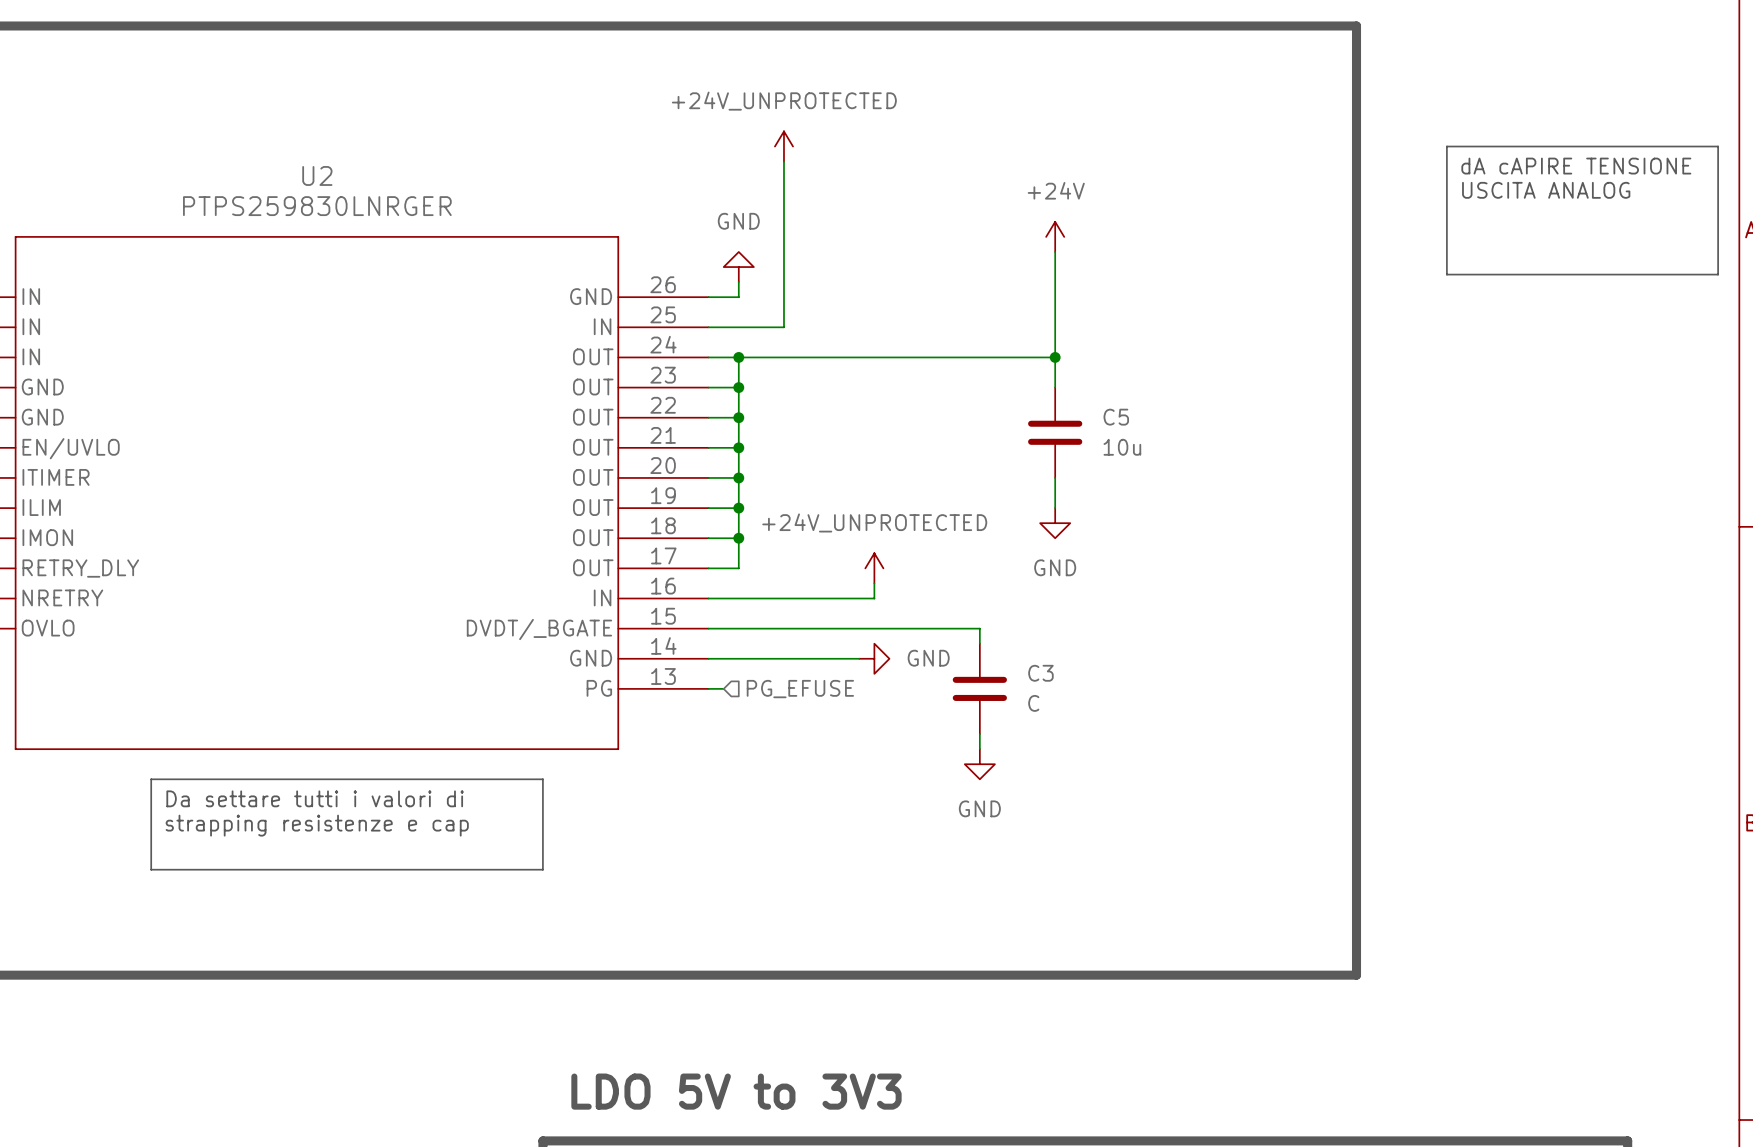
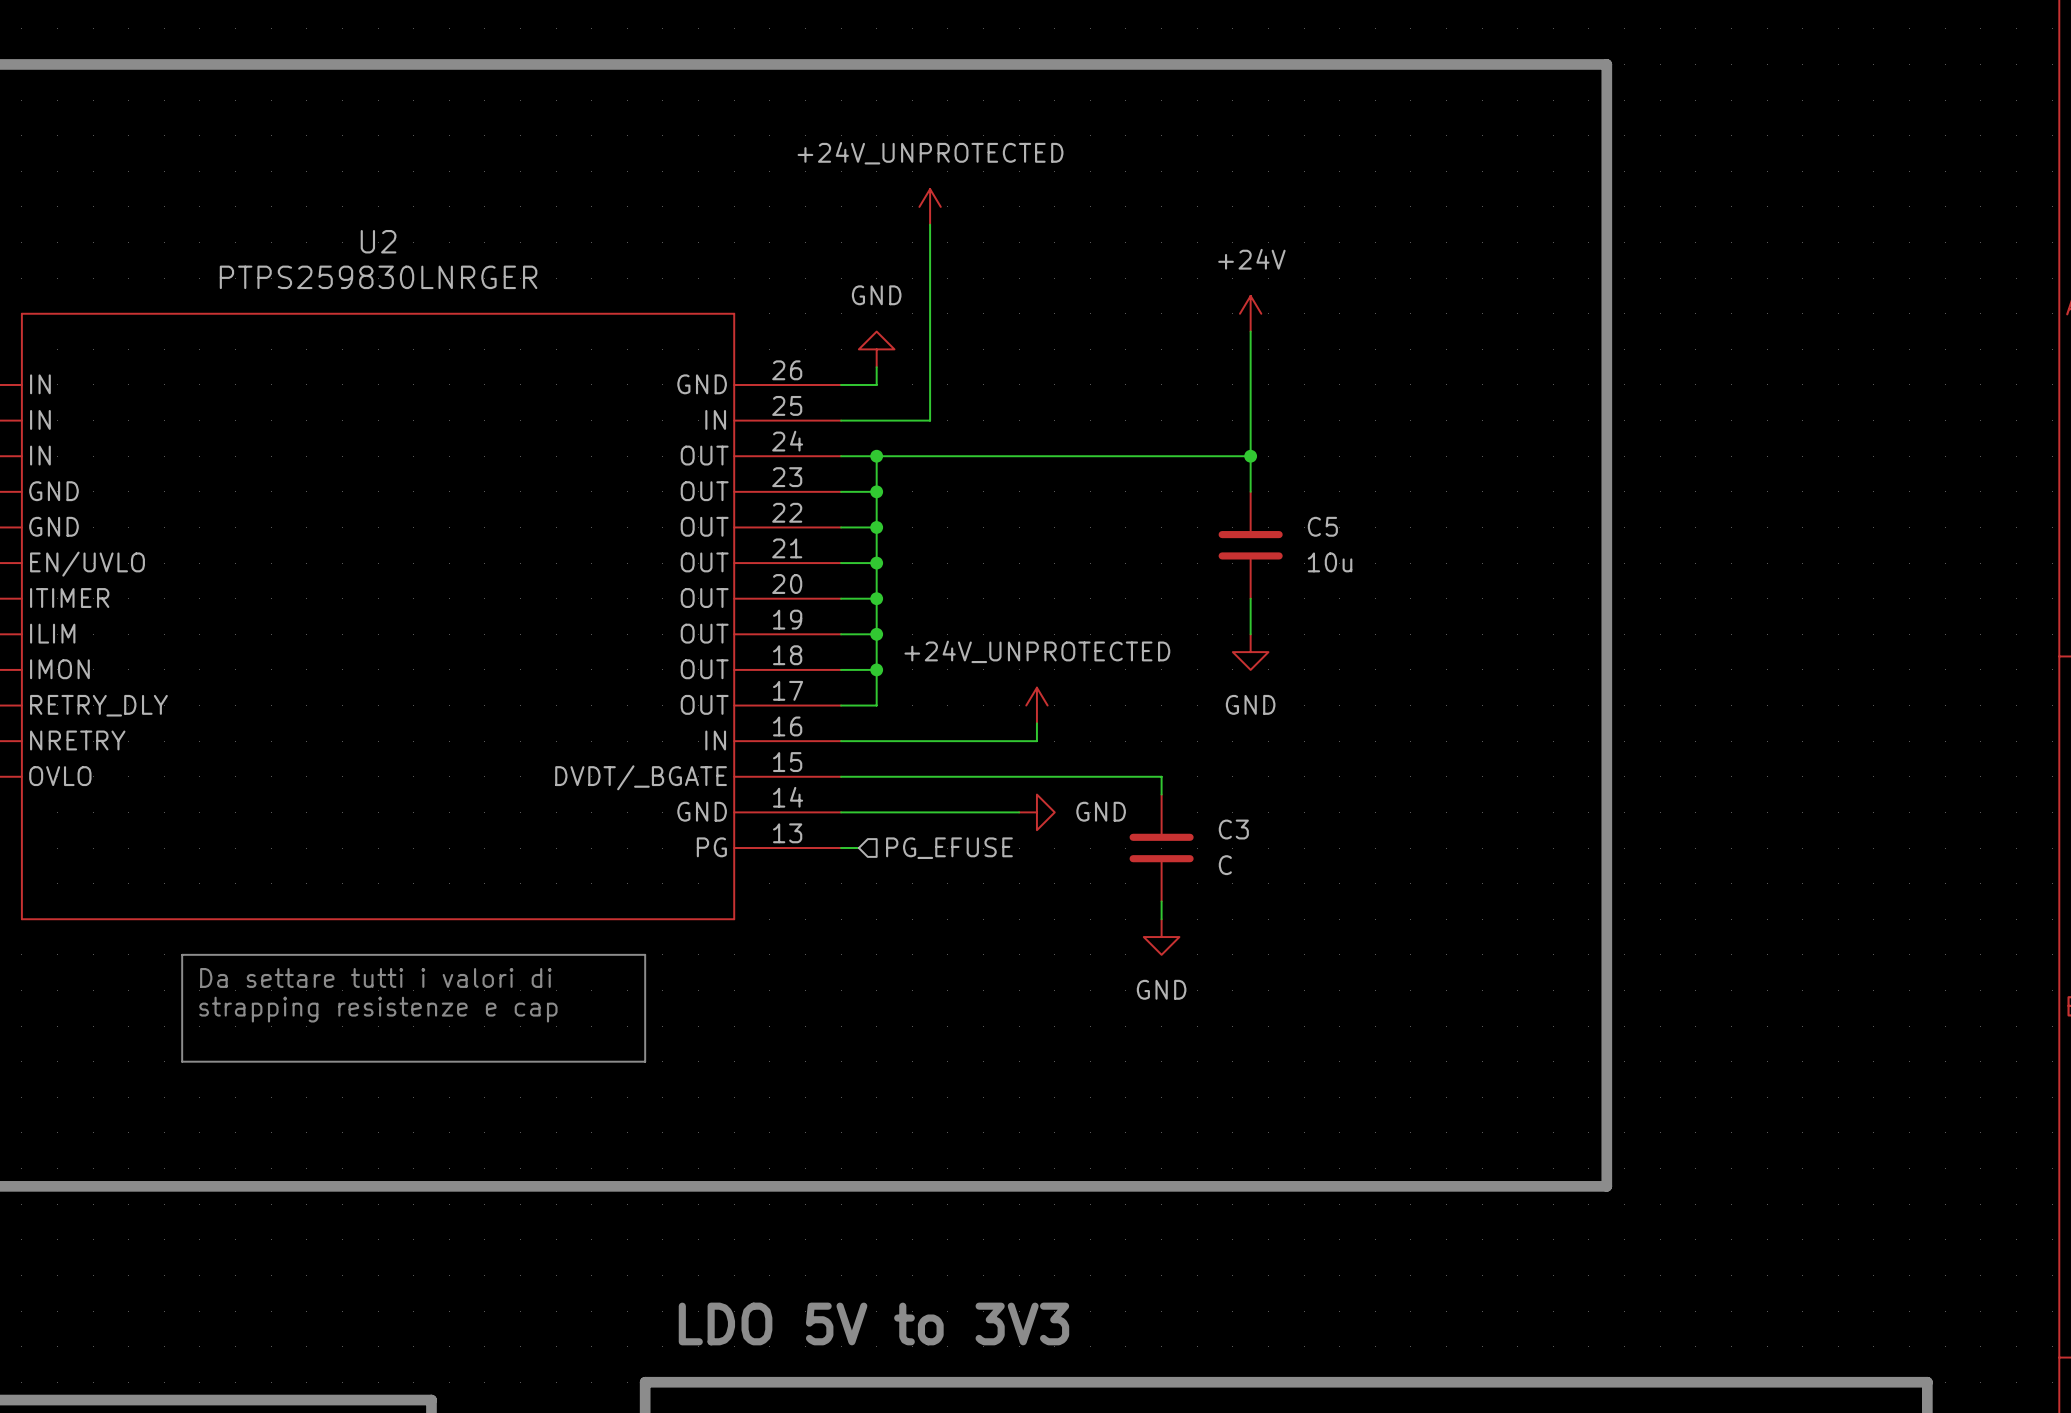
line: (1446, 146) (1718, 146) (1718, 274) (1446, 274) (1446, 146) -> none
text: dA cAPIRE TENSIONE (1576, 166) -> none
text: USCITA ANALOG (1546, 190) -> none

